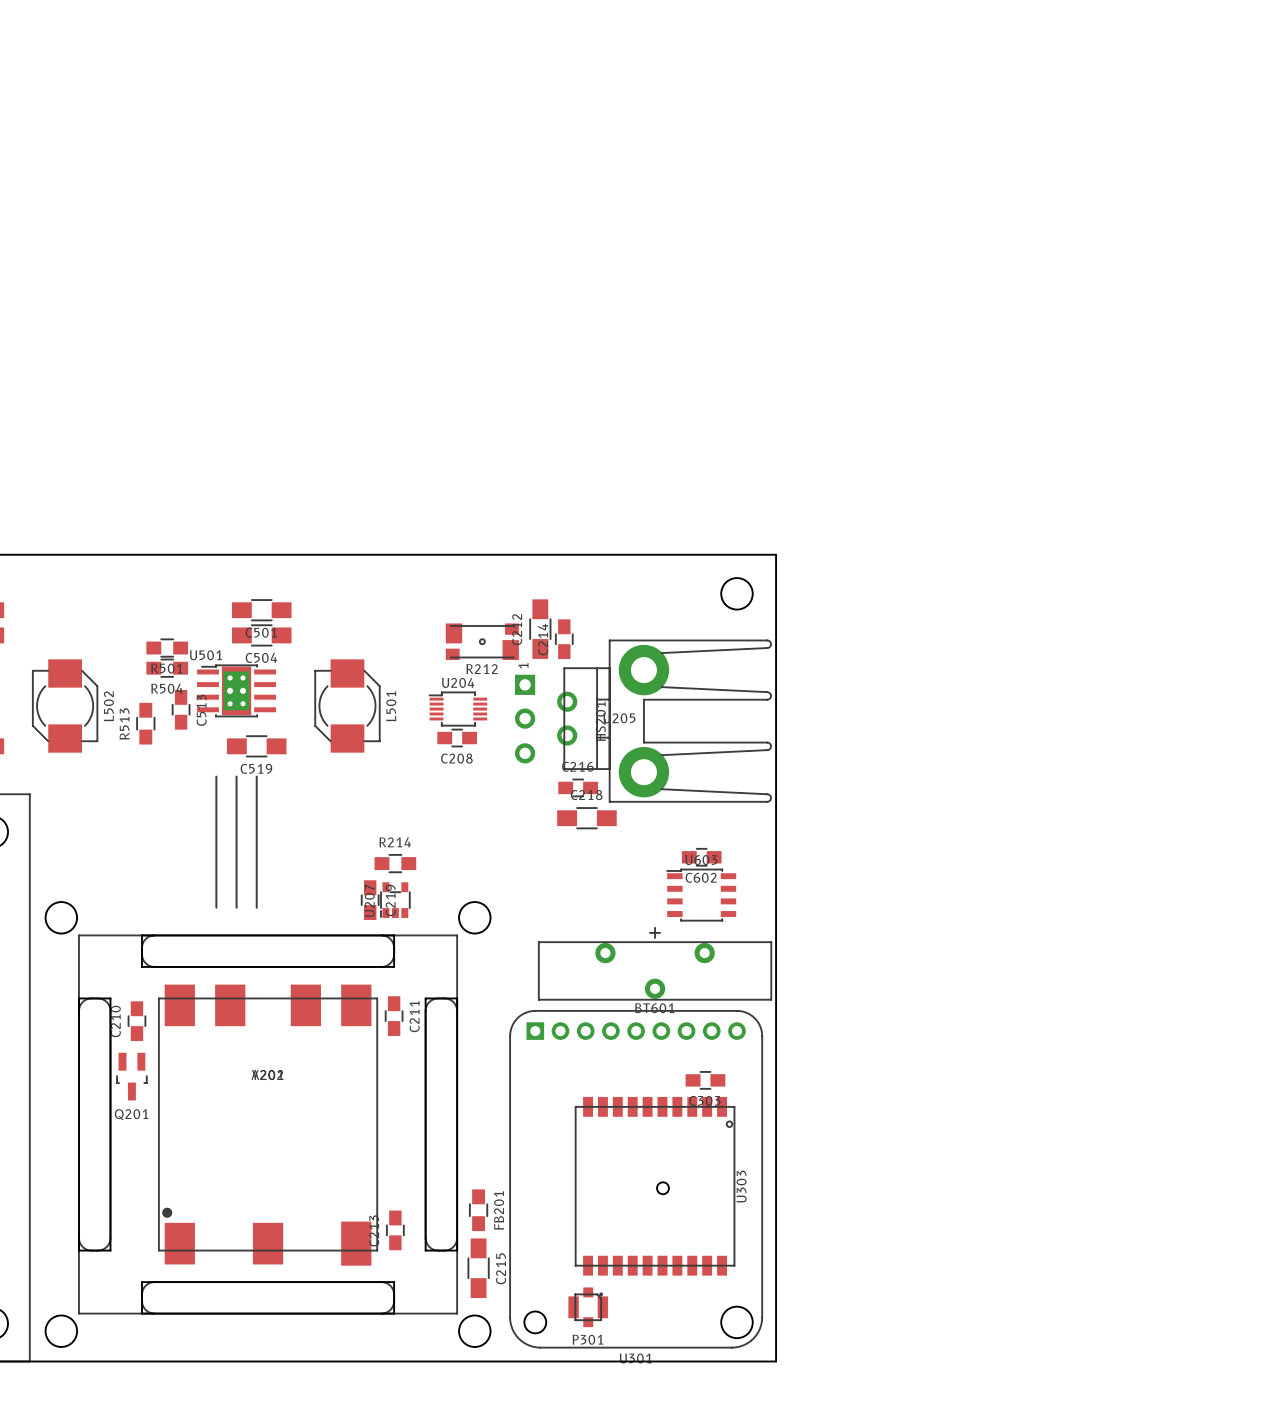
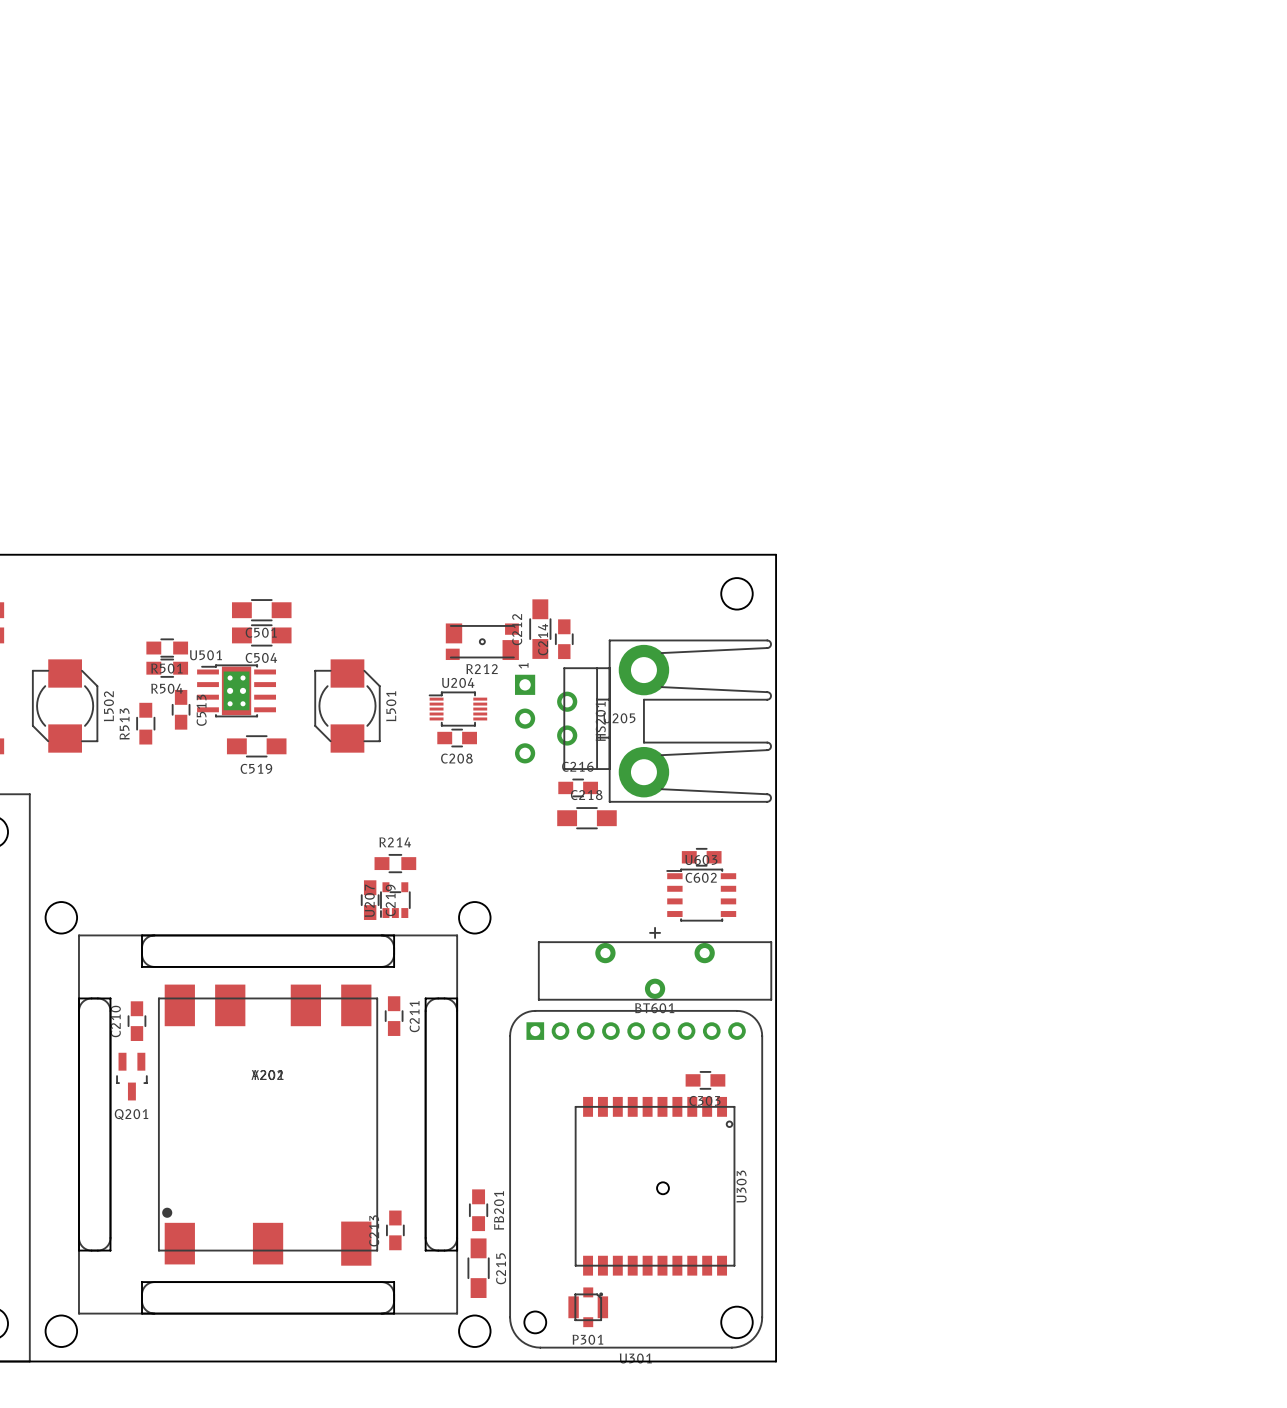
line: (216, 776) (216, 907) -> none
line: (236, 776) (236, 907) -> none
line: (256, 776) (256, 907) -> none

